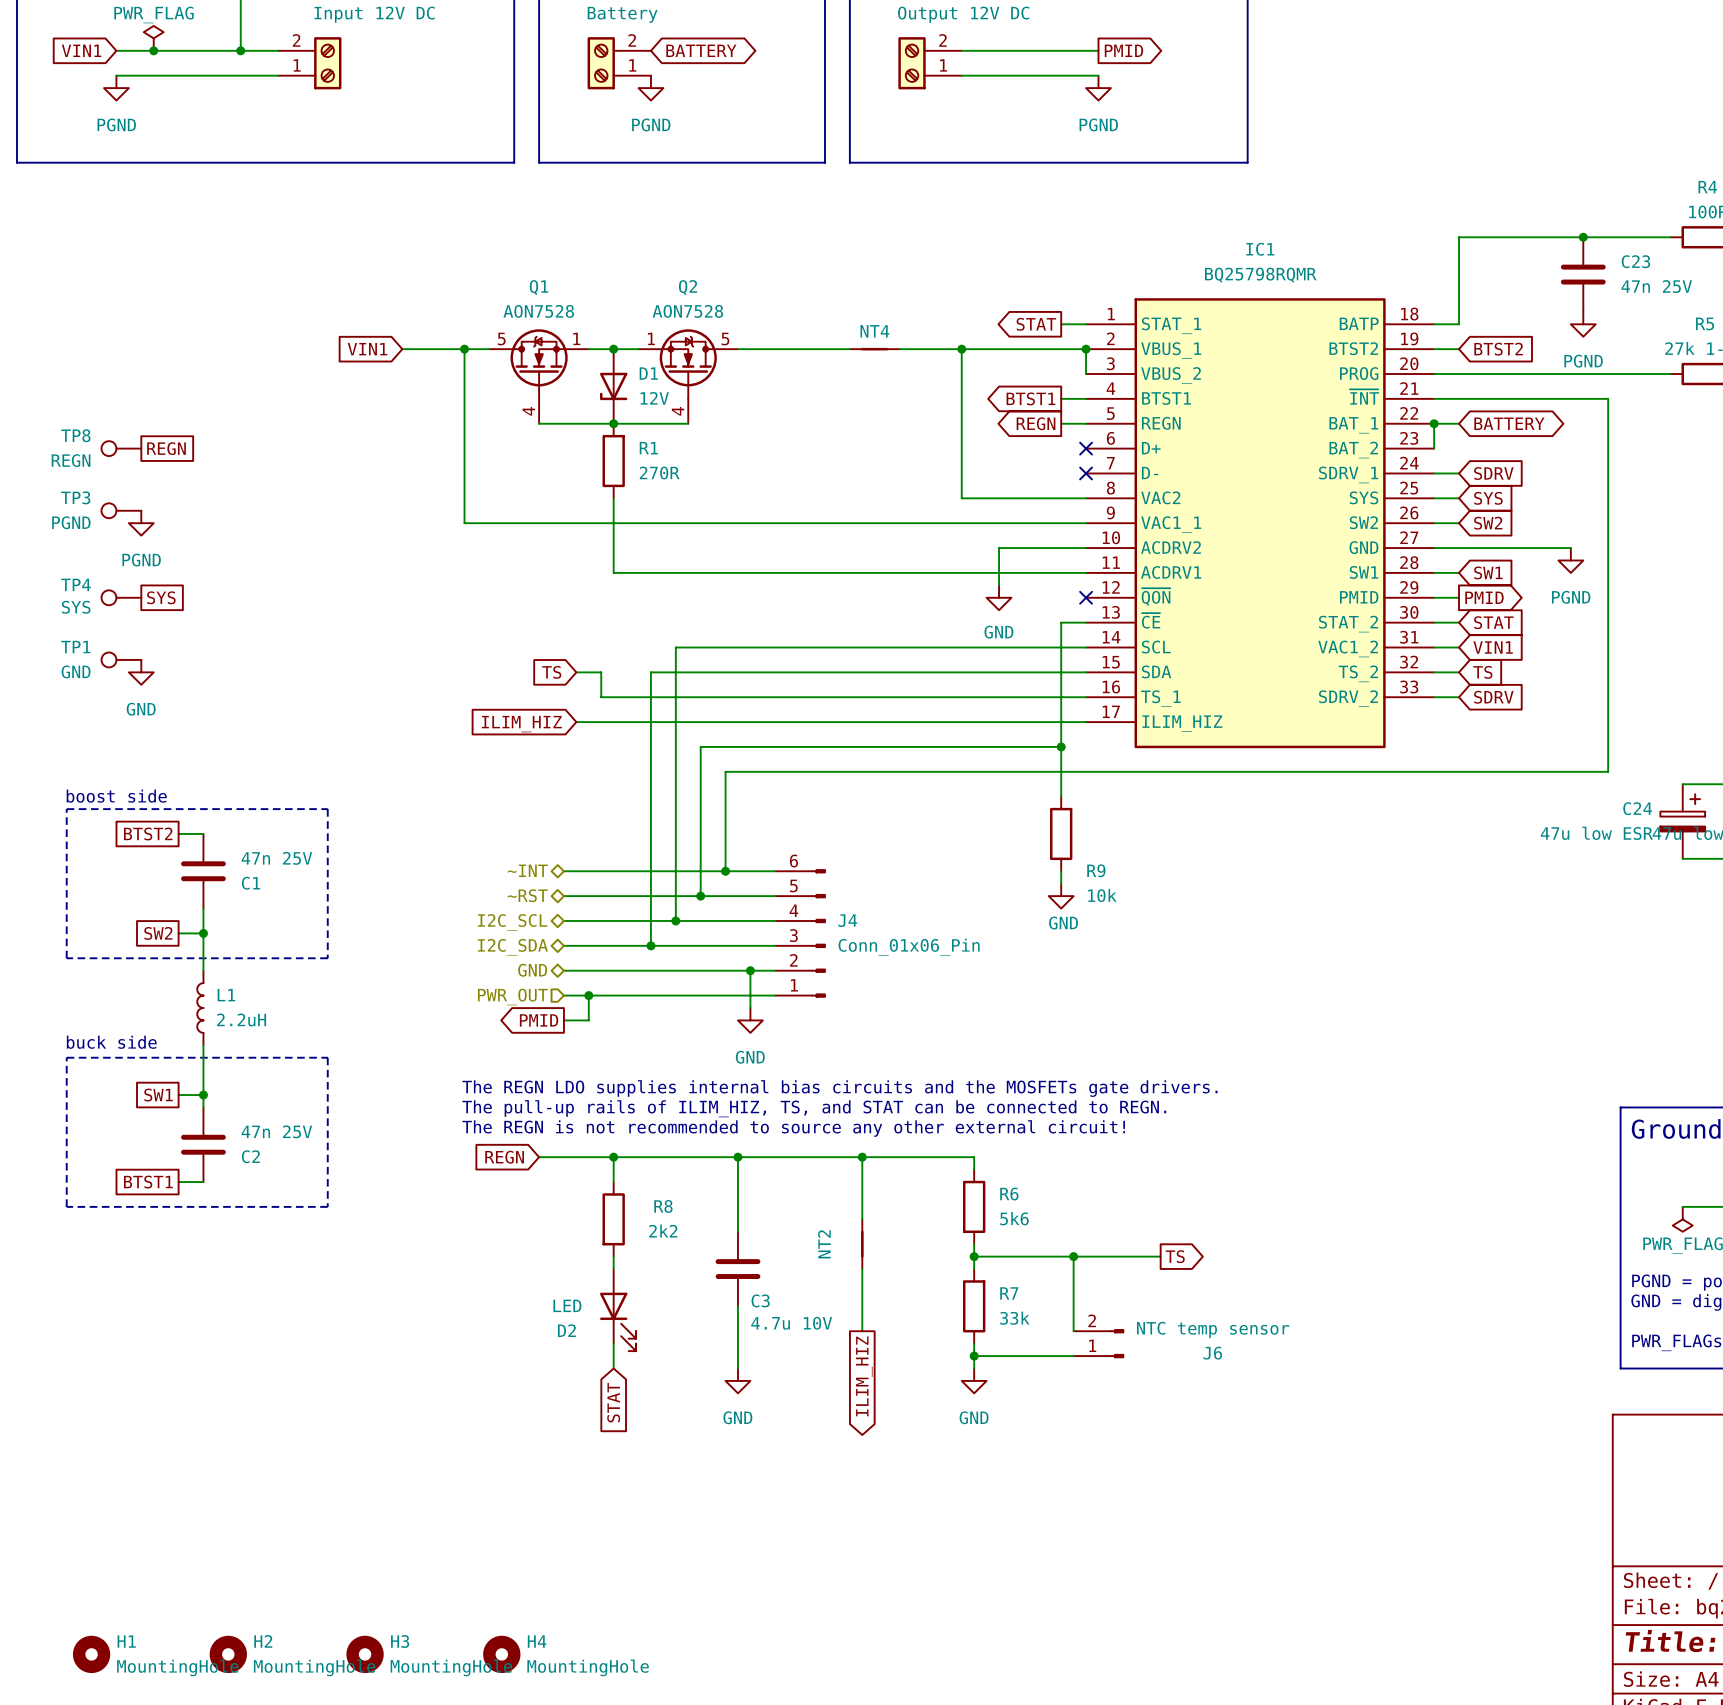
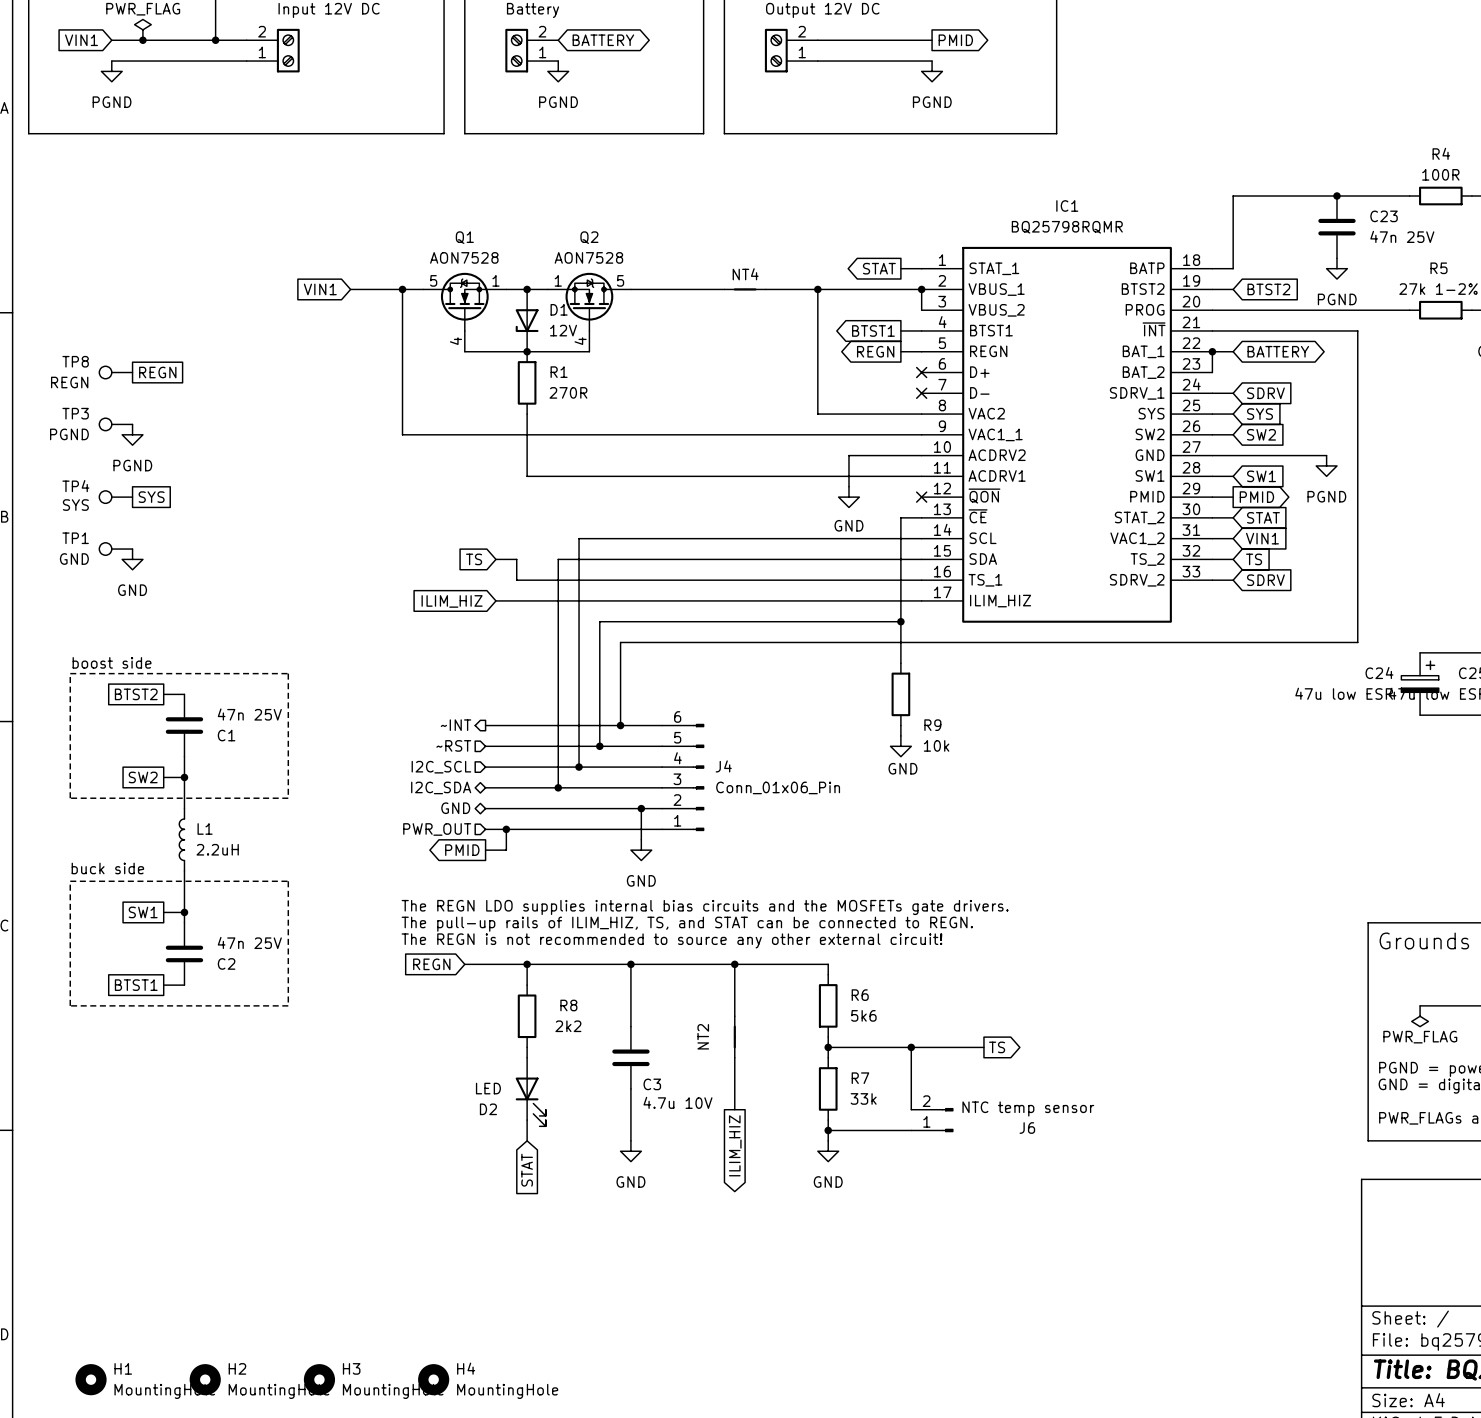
hierarchical label shape: bidirectional (527, 870) -> output (456, 725)
hierarchical label shape: bidirectional (527, 895) -> input (453, 745)
hierarchical label shape: bidirectional (512, 922) -> input (441, 767)

